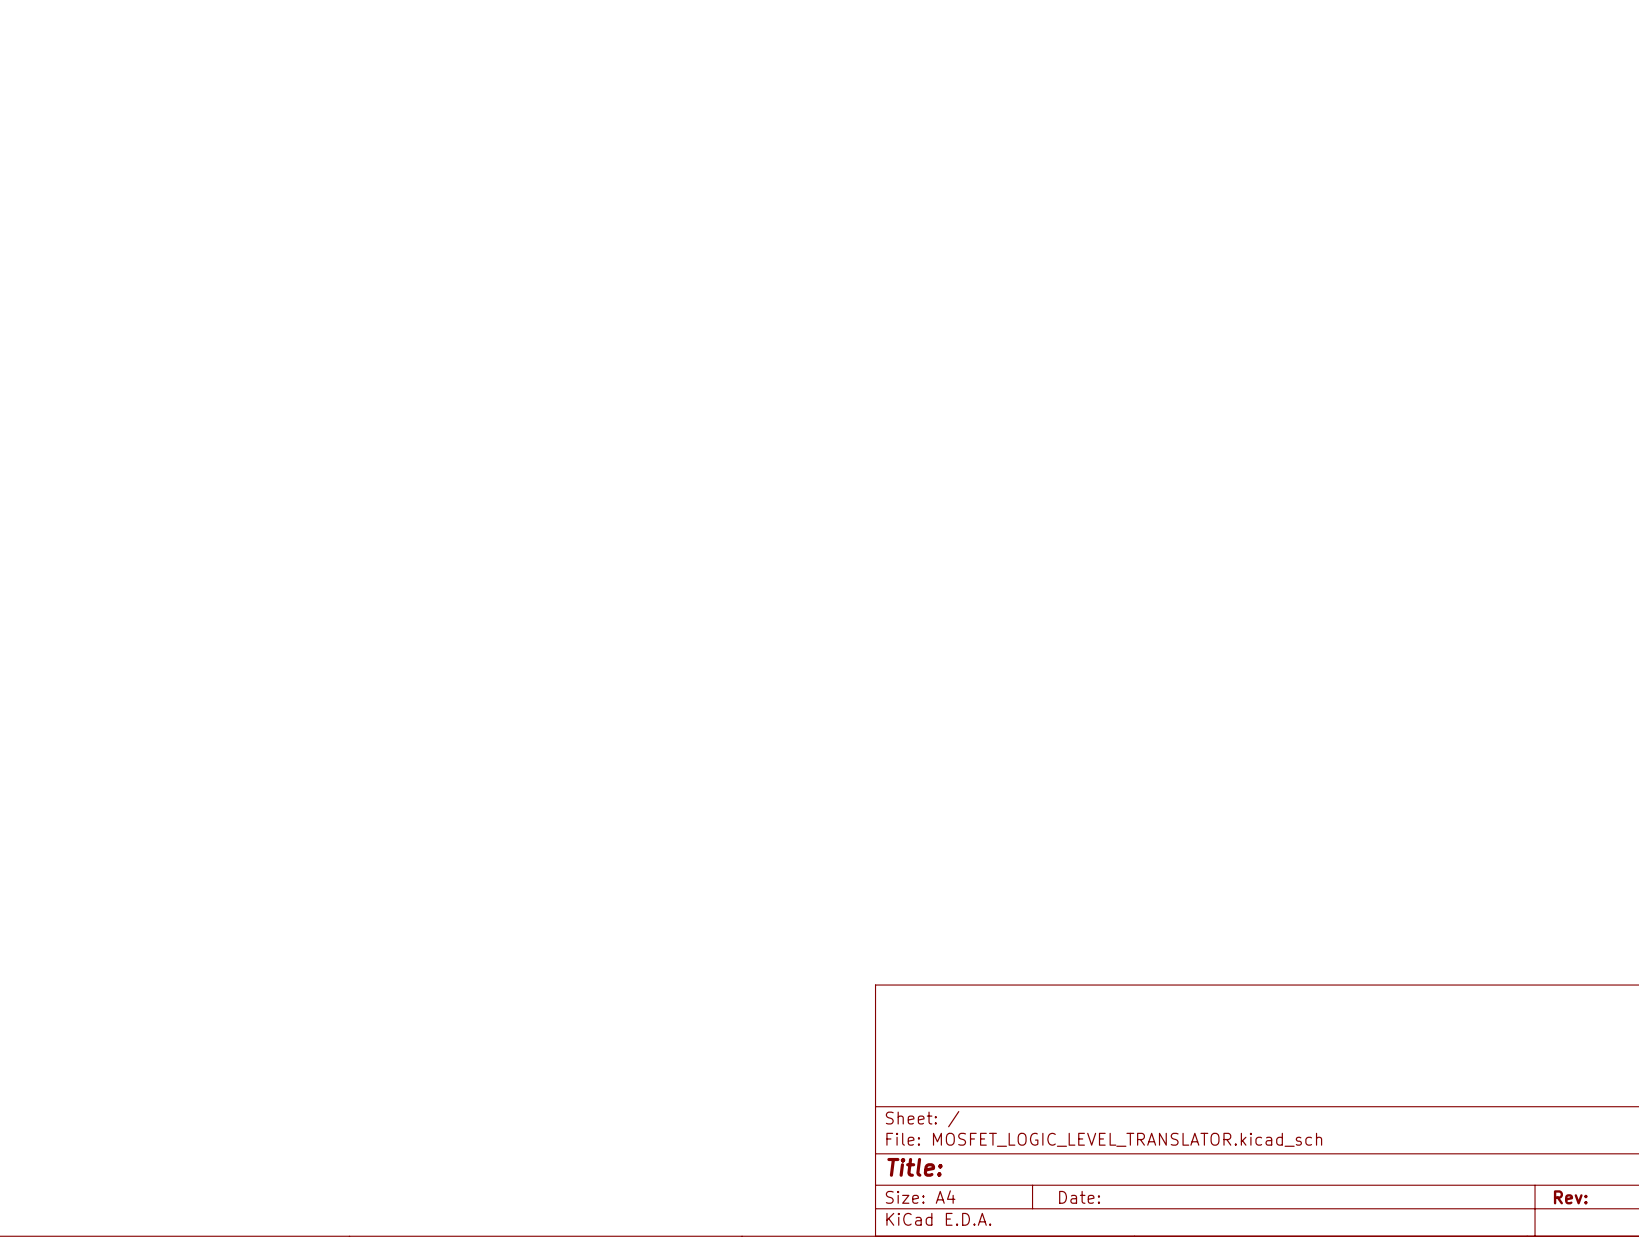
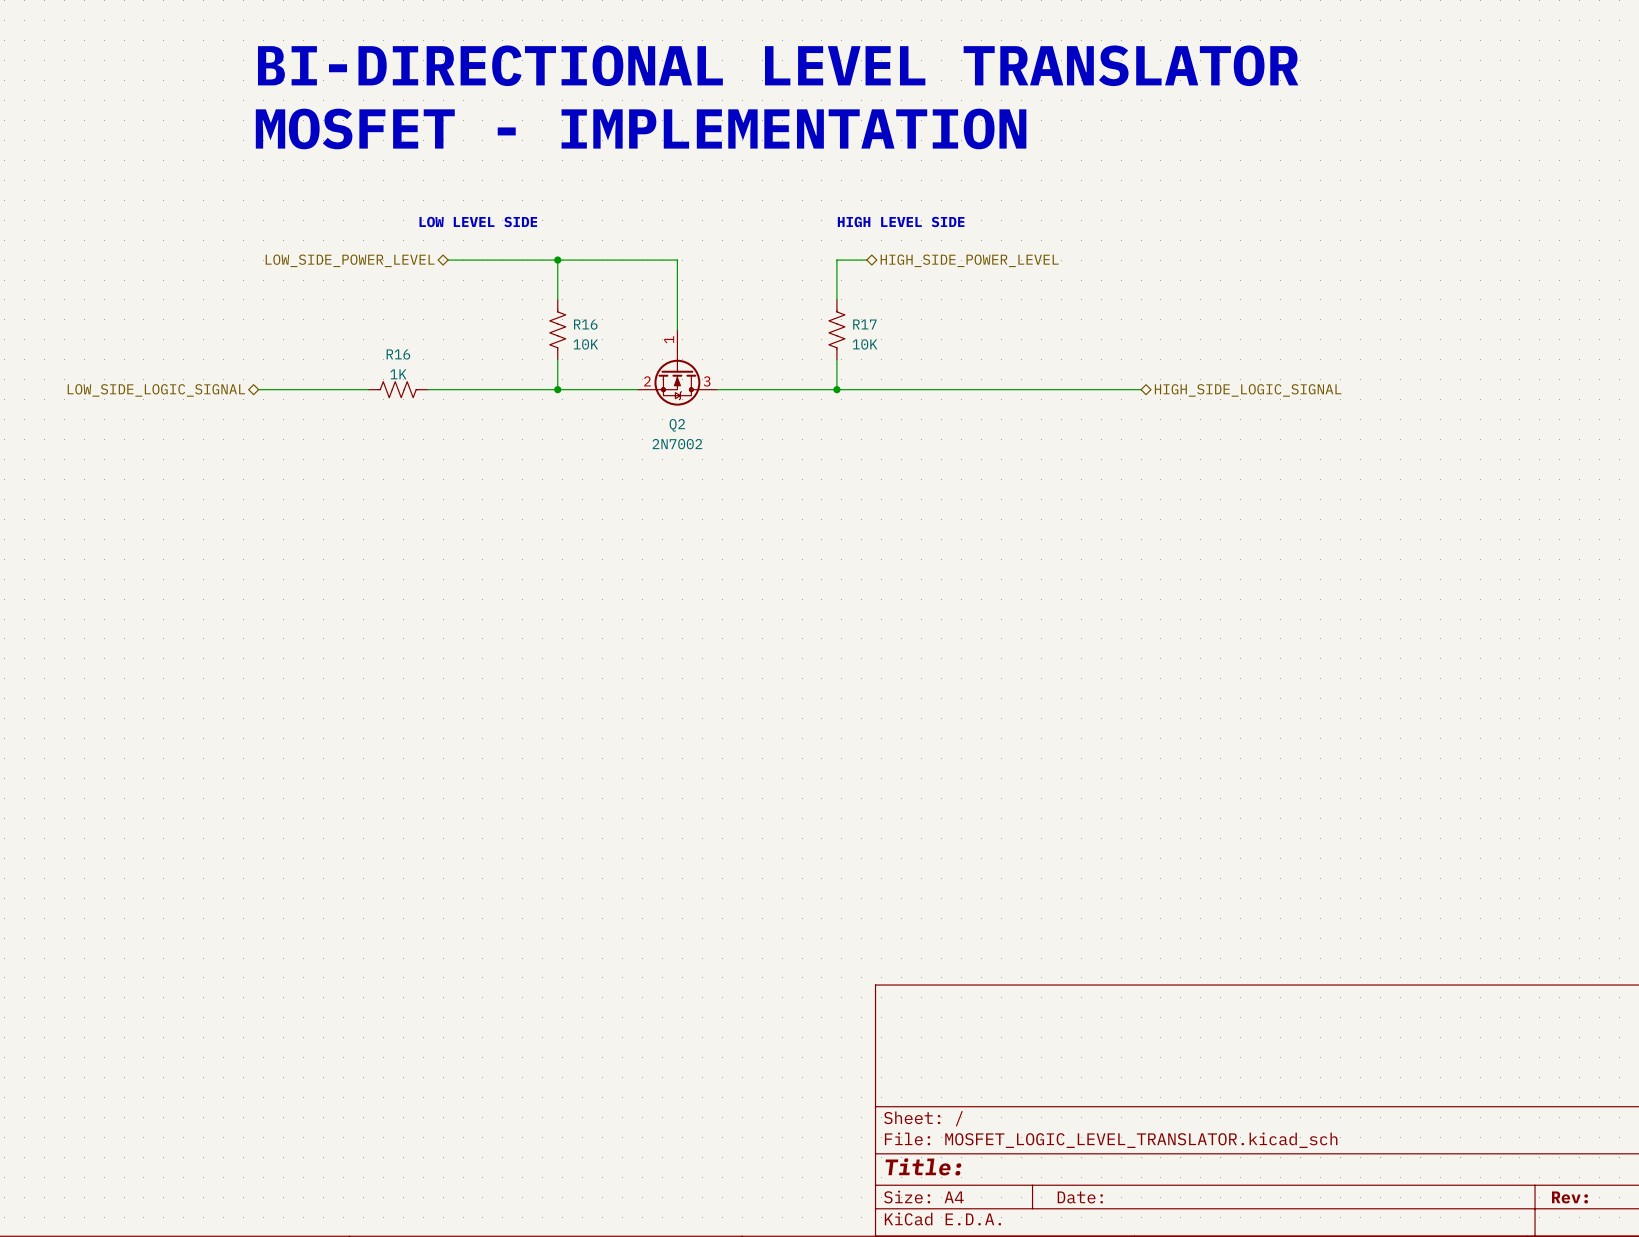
text: none -> BI-DIRECTIONAL LEVEL TRANSLATOR (778, 65)
text: none -> MOSFET - IMPLEMENTATION (641, 128)
text: none -> LOW LEVEL SIDE (478, 221)
text: none -> HIGH LEVEL SIDE (901, 221)
hierarchical label: none -> LOW_SIDE_POWER_LEVEL (350, 260)
wire: none -> (448, 260) (677, 260) (677, 329)
wire: none -> (557, 260) (557, 299)
junction: none -> (557, 260)
wire: none -> (866, 260) (836, 260) (836, 299)
hierarchical label: none -> HIGH_SIDE_POWER_LEVEL (969, 260)
R16: none -> 10K (557, 329)
R17: none -> 10K (836, 329)
wire: none -> (557, 359) (557, 389)
wire: none -> (836, 359) (836, 389)
Q2: none -> 2N7002 (677, 367)
hierarchical label: none -> LOW_SIDE_LOGIC_SIGNAL (156, 390)
wire: none -> (258, 389) (368, 389)
R16: none -> 1K (398, 389)
wire: none -> (428, 389) (637, 389)
junction: none -> (557, 389)
wire: none -> (717, 389) (1141, 389)
junction: none -> (836, 389)
hierarchical label: none -> HIGH_SIDE_LOGIC_SIGNAL (1248, 390)

